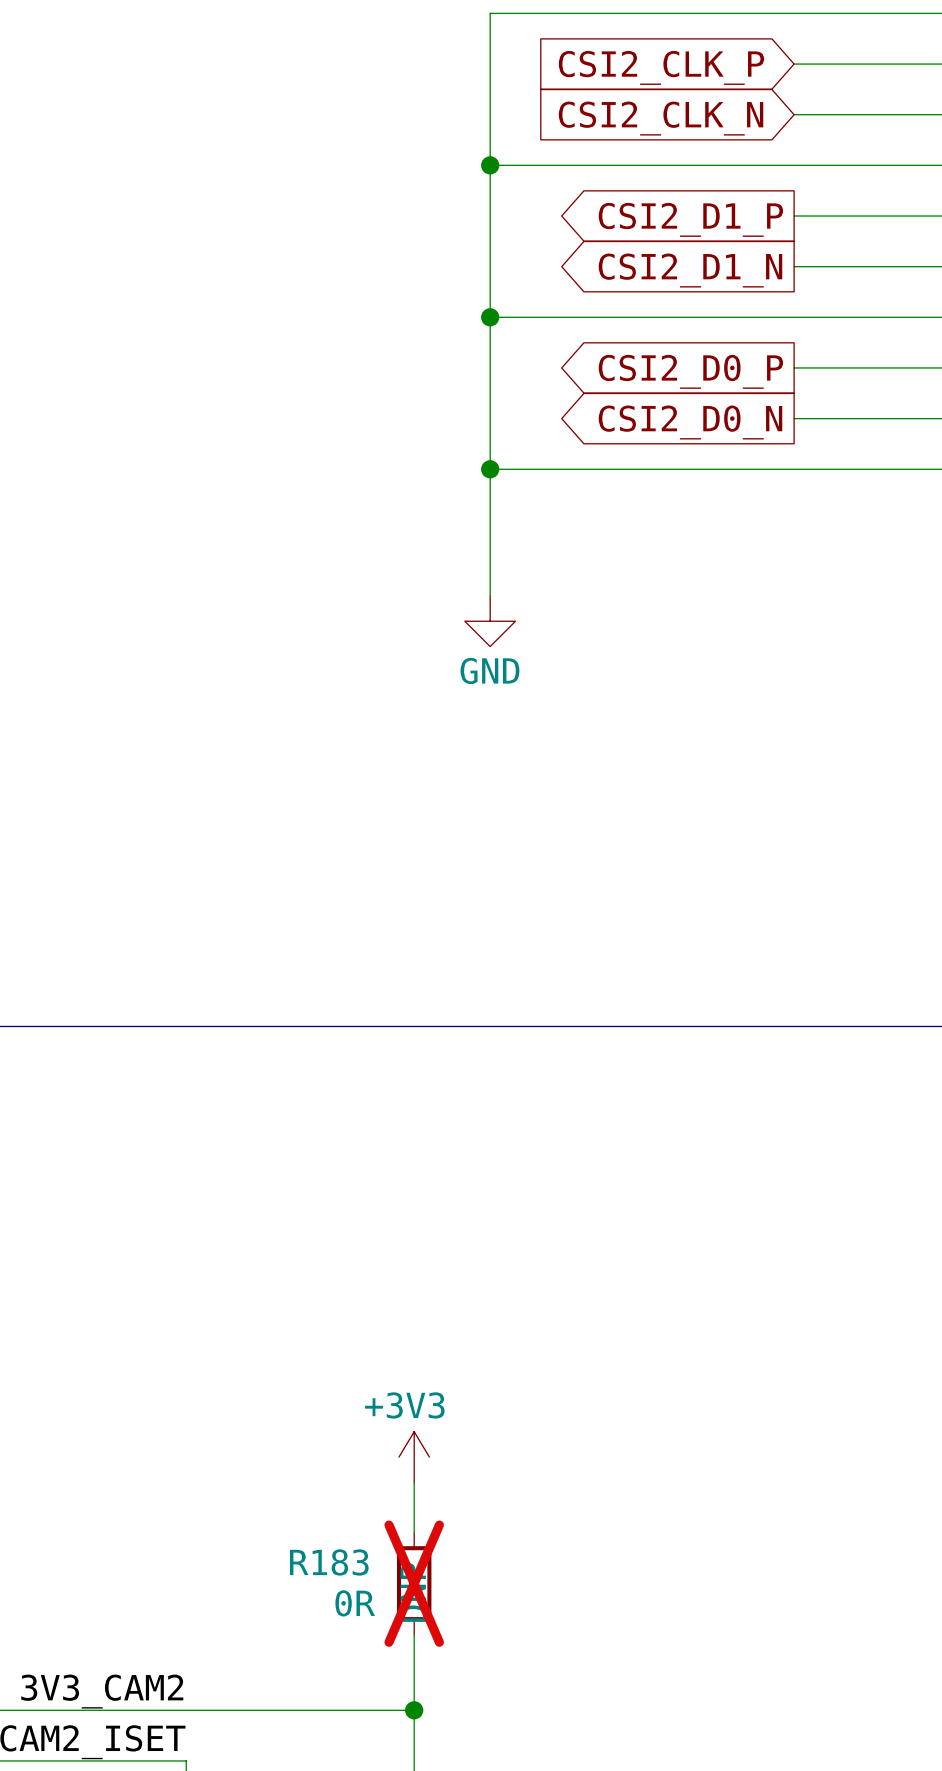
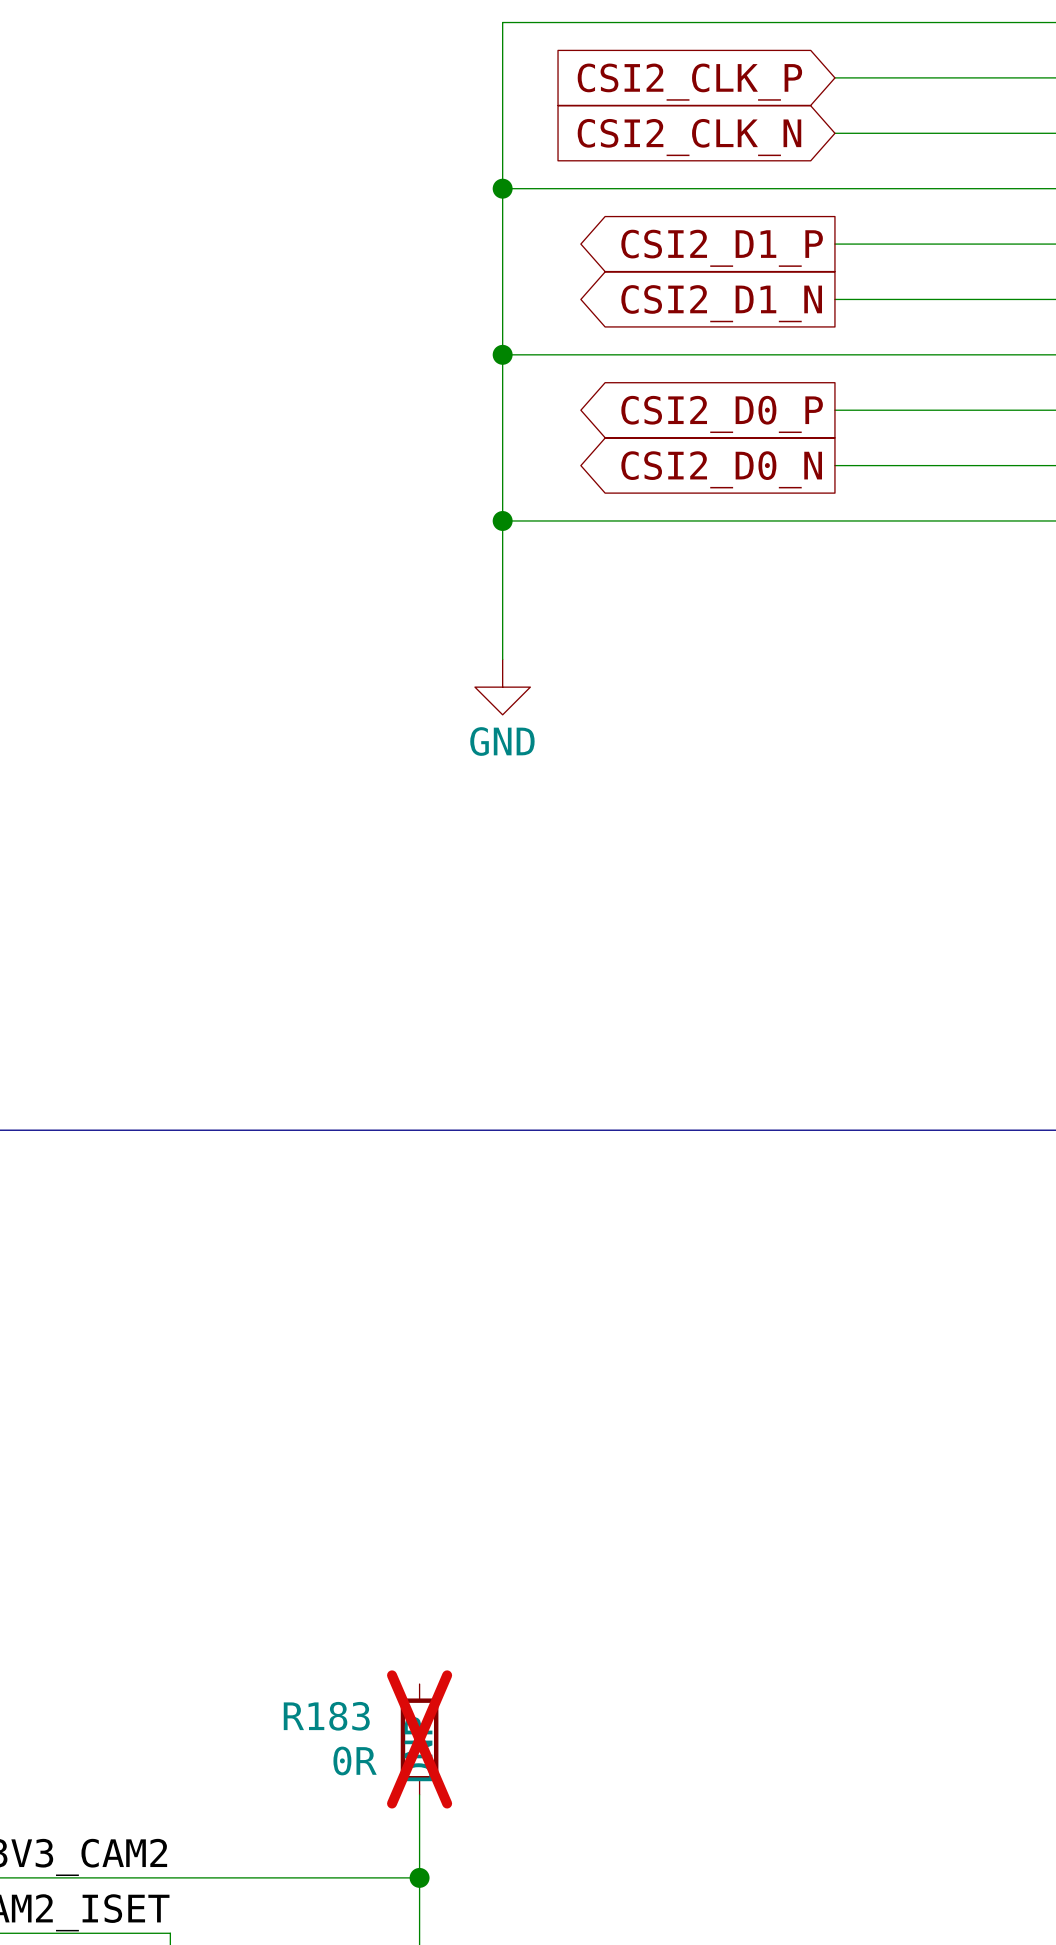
power symbol: +3V3 (414, 1457) -> none
wire: (414, 1482) (414, 1533) -> none

